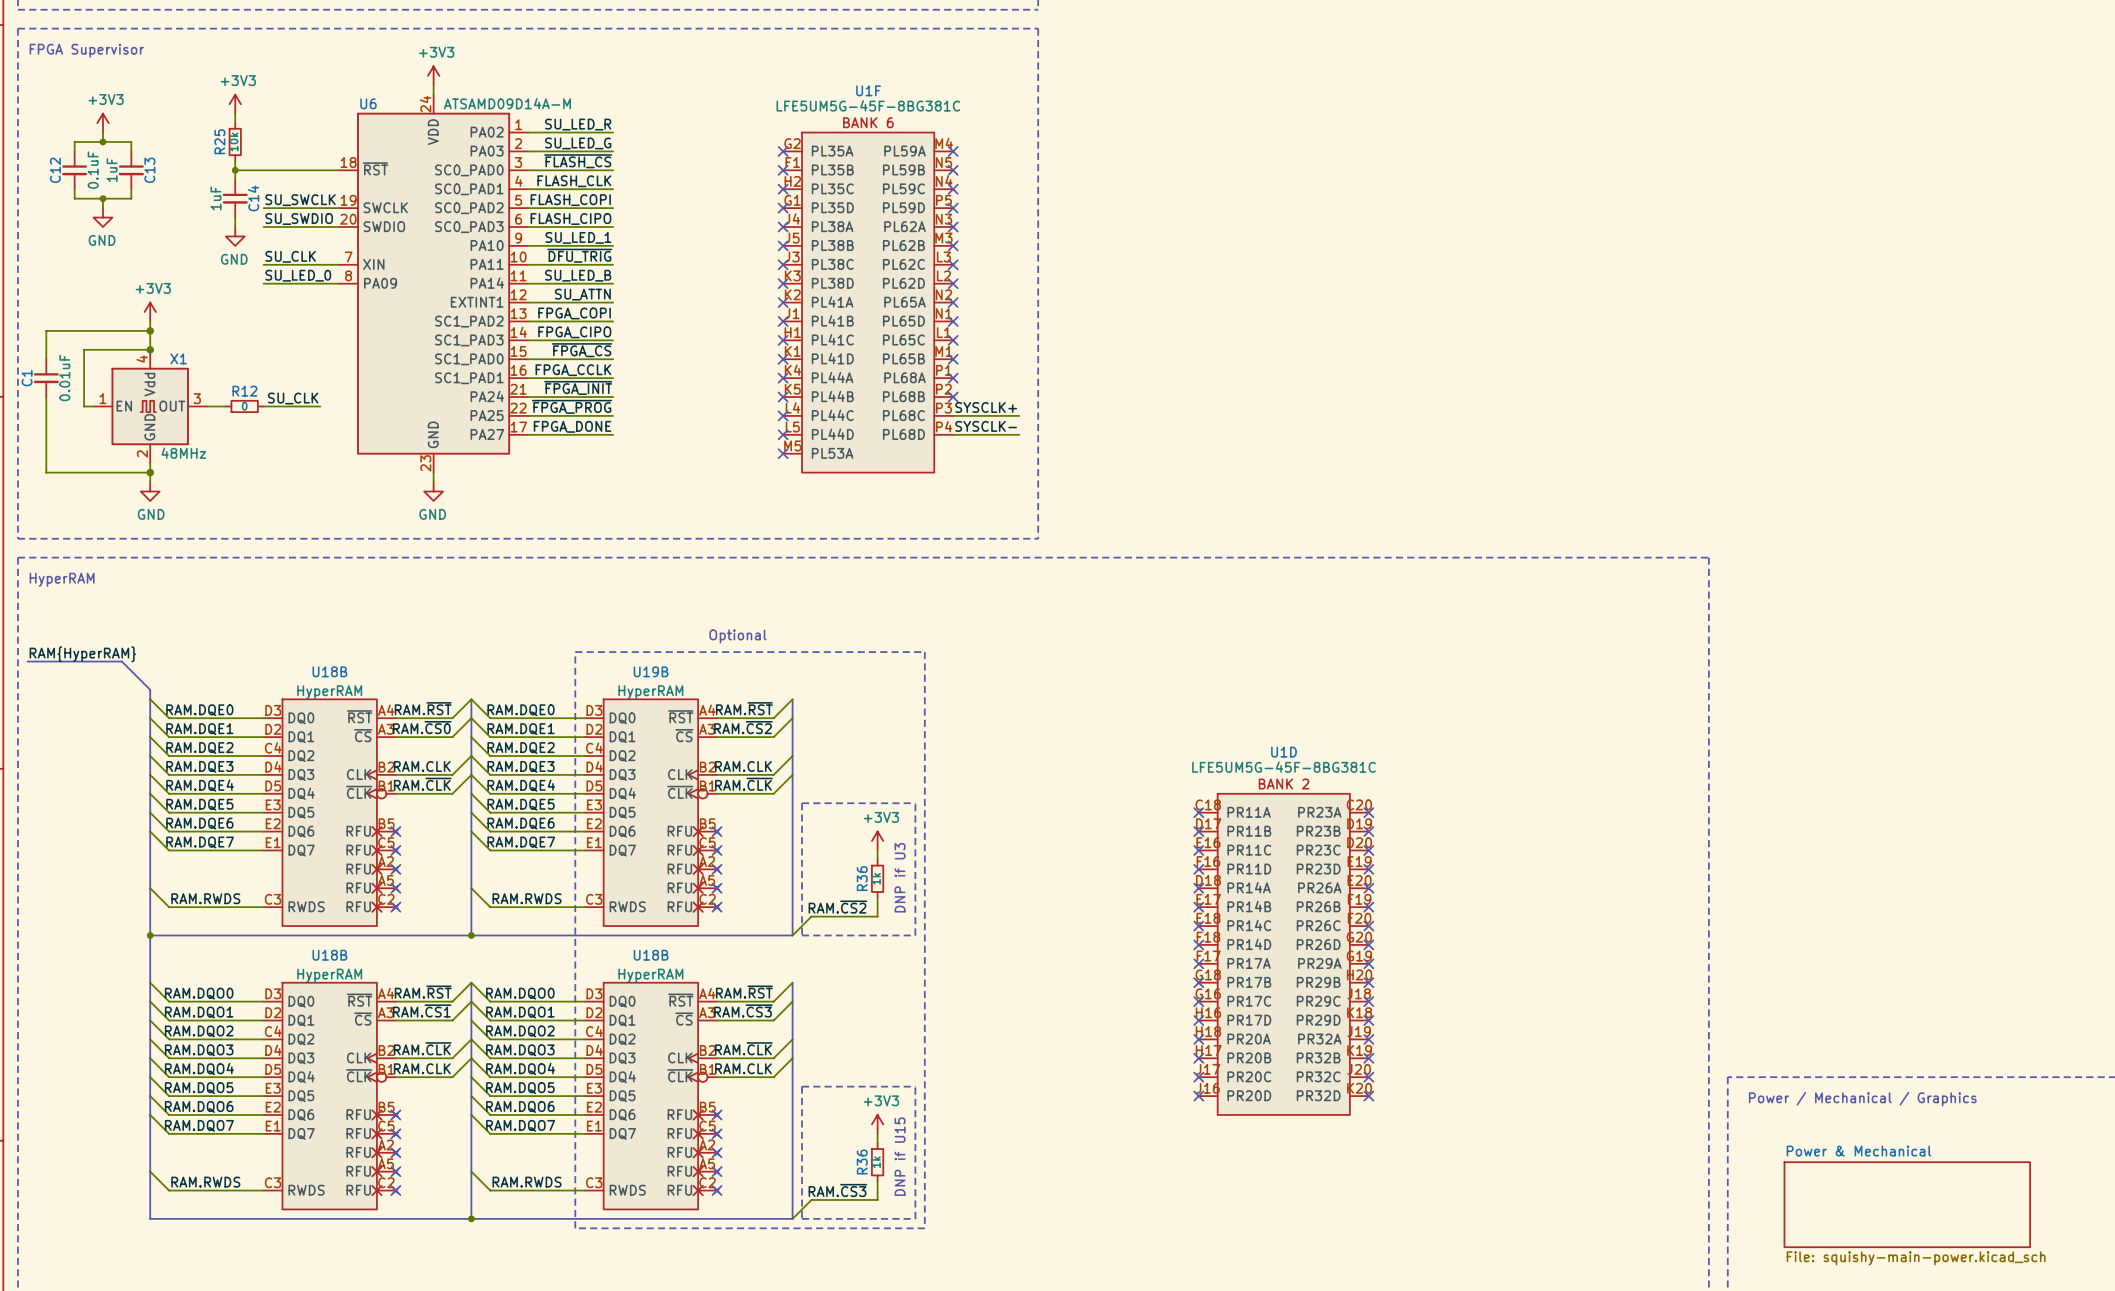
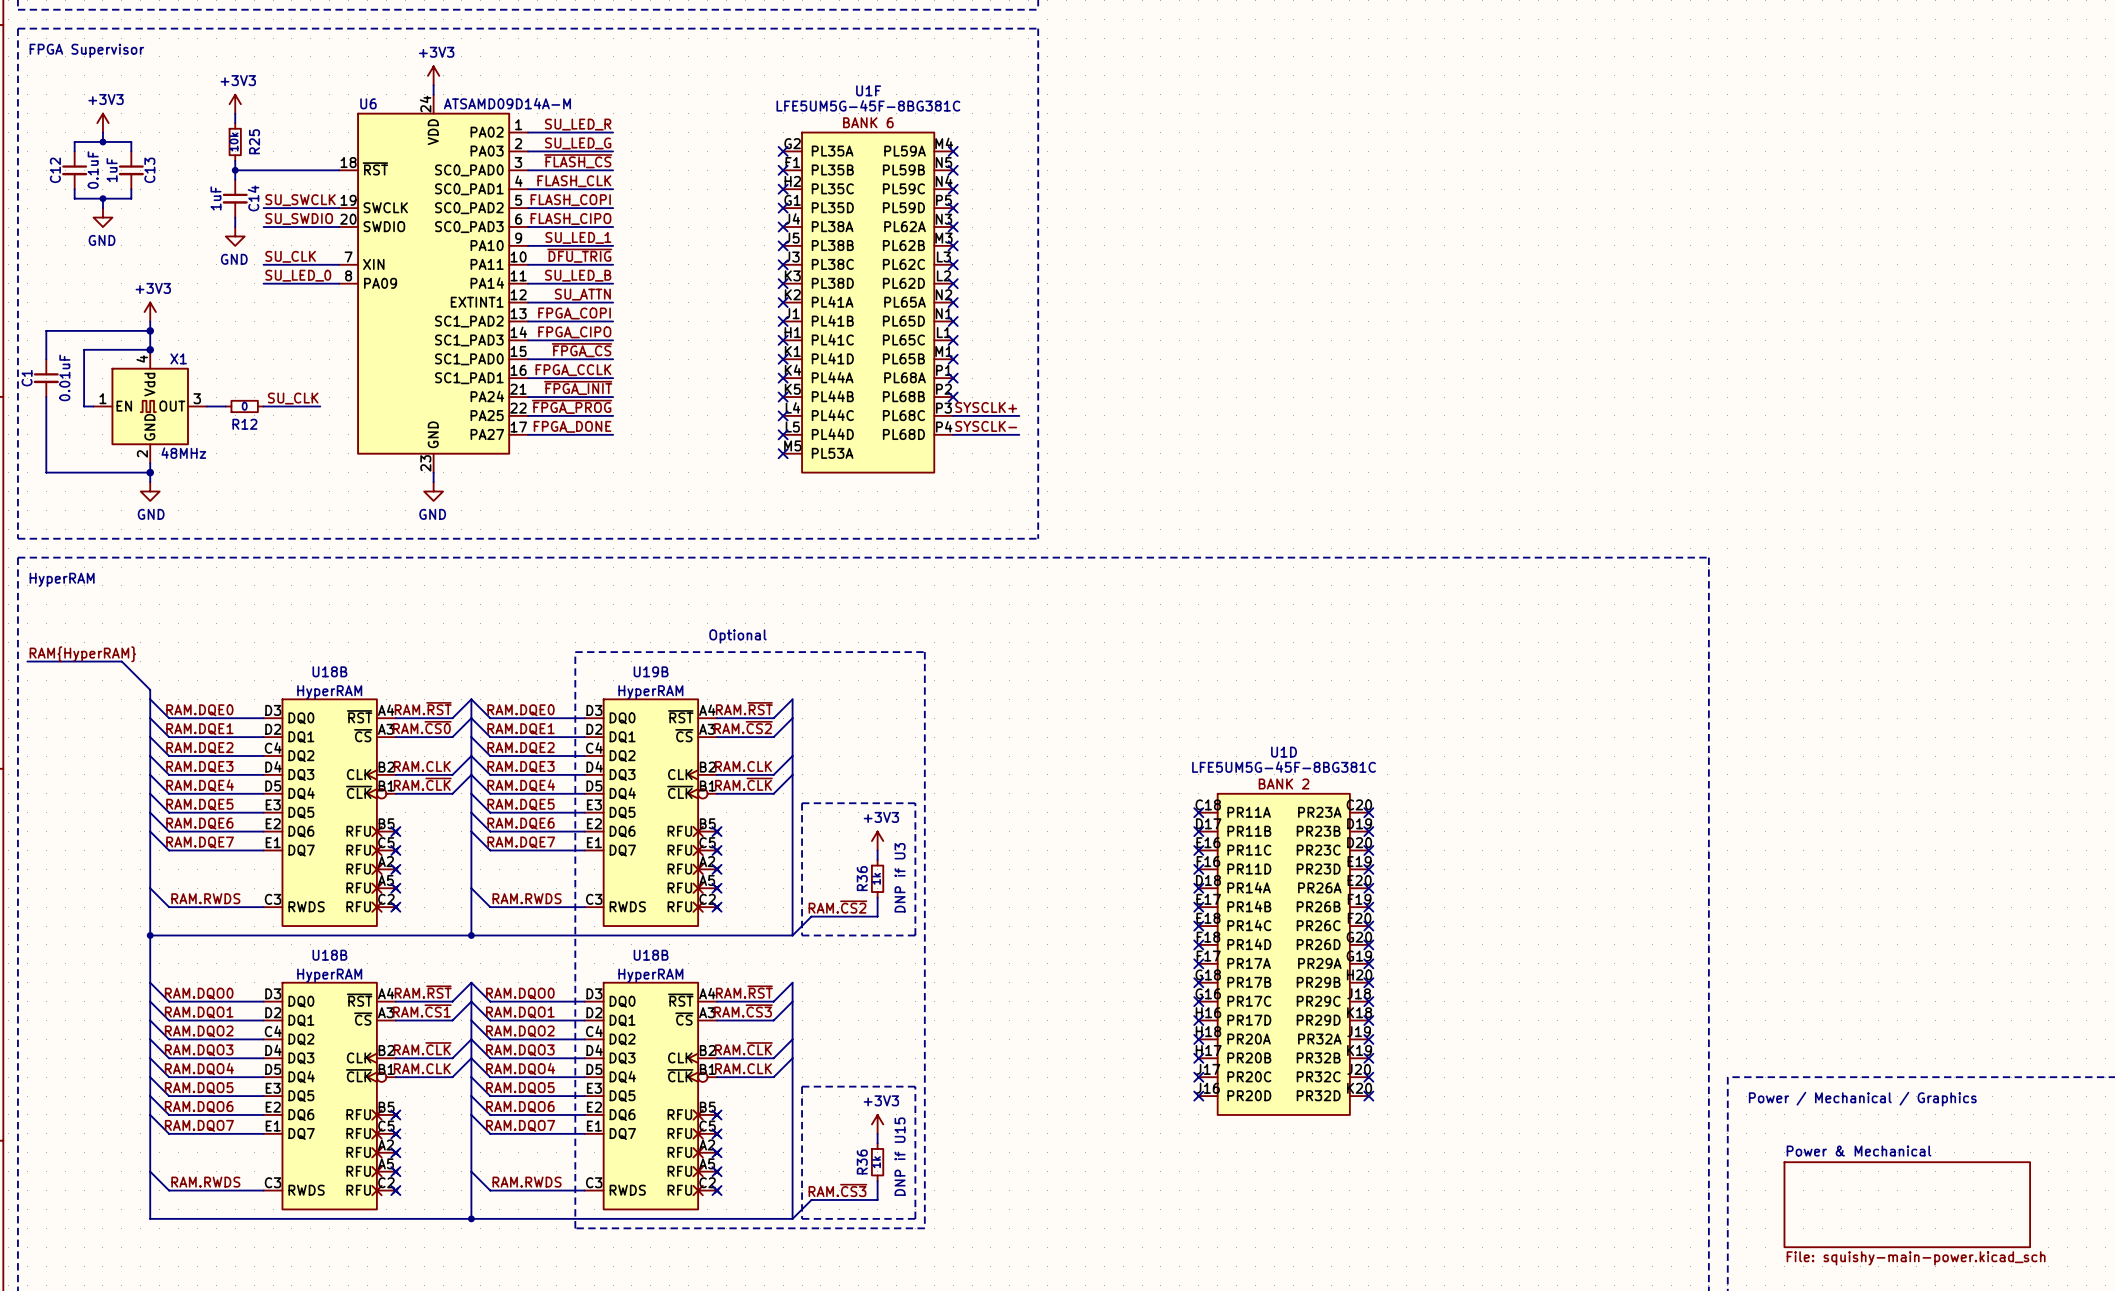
R25 name position: R25 (219, 141) -> R25 (254, 141)
R12 name position: R12 (244, 391) -> R12 (244, 424)

